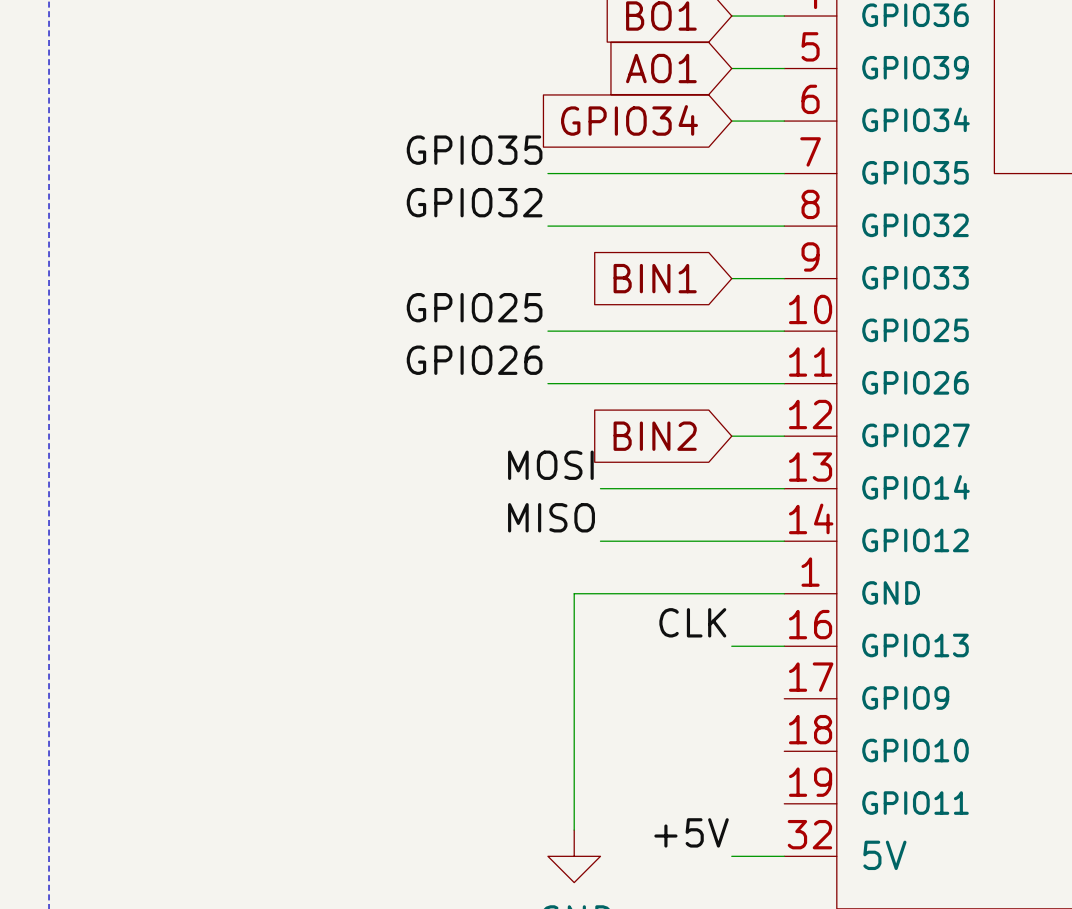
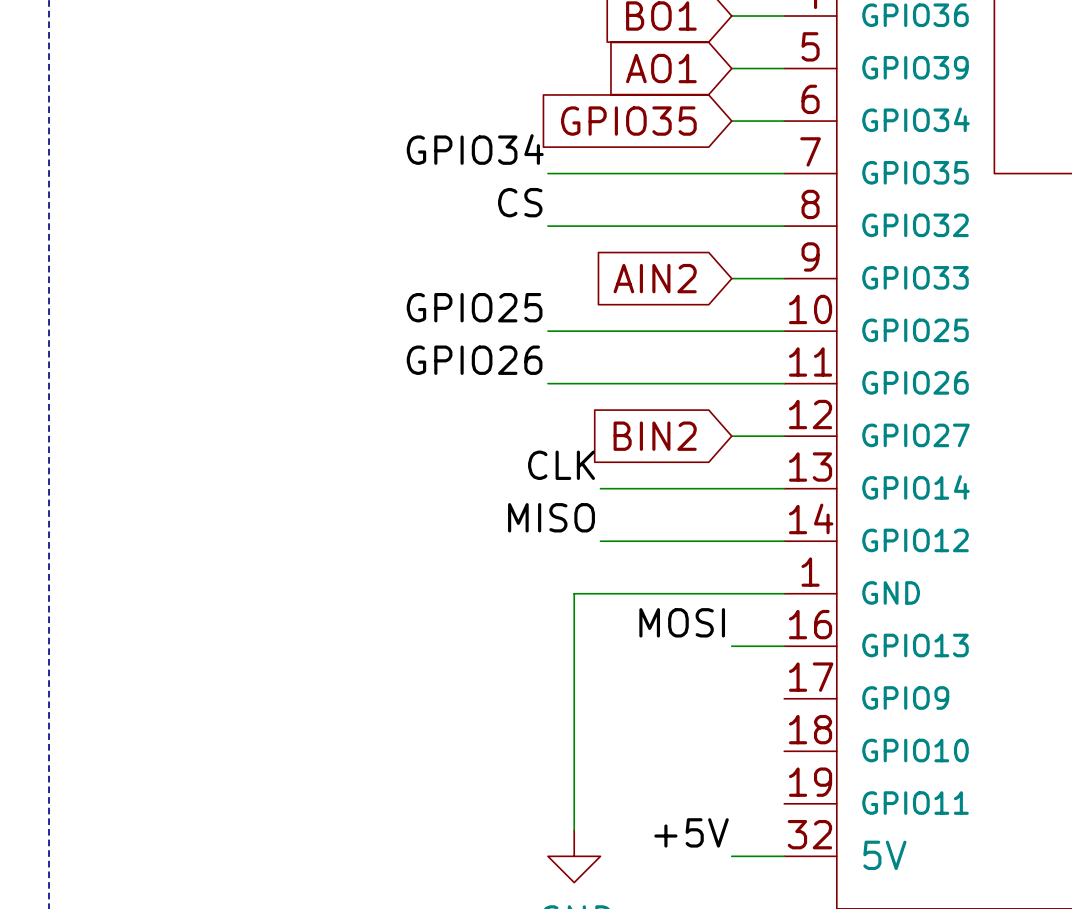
global label: GPIO34 (629, 120) -> GPIO35 (628, 121)
label: GPIO35 (474, 150) -> GPIO34 (475, 149)
label: GPIO32 (474, 202) -> CS (520, 202)
global label: BIN1 (655, 278) -> AIN2 (655, 278)
label: MOSI (550, 465) -> CLK (561, 465)
label: CLK (692, 622) -> MOSI (682, 622)

